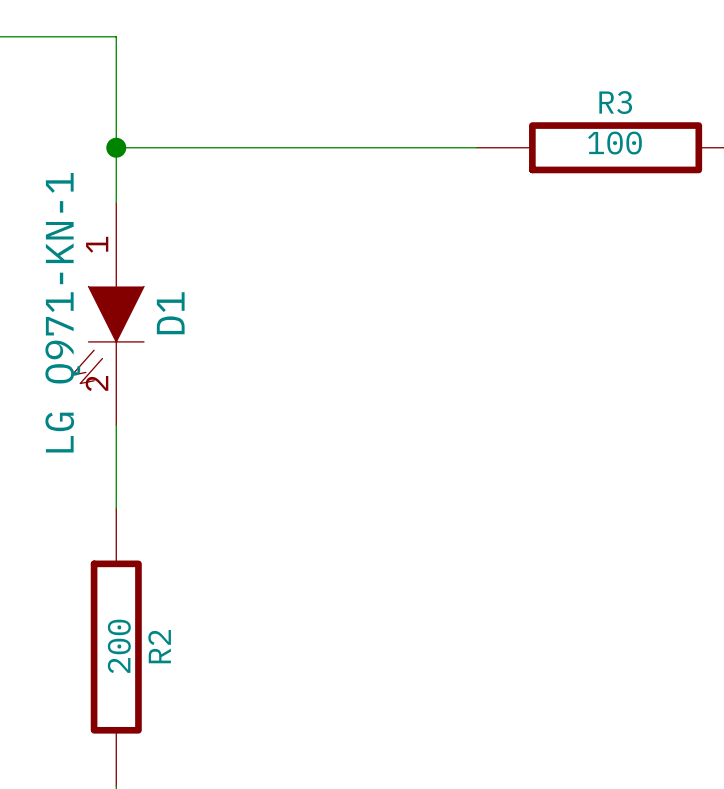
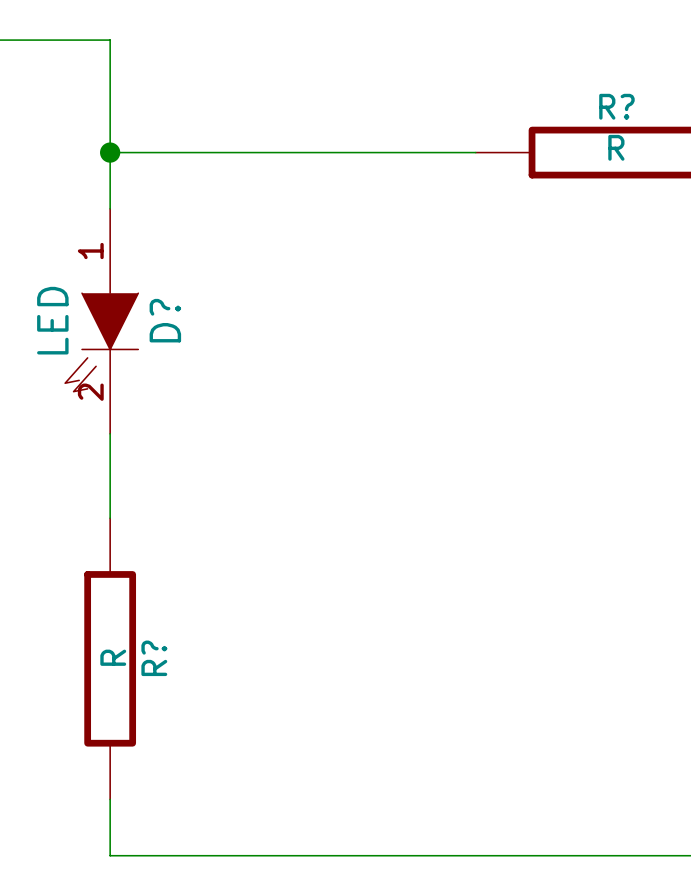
R3 name: R3 (615, 102) -> R? (616, 106)
R3 value: 100 (614, 143) -> R (616, 147)
D1 value: LG Q971-KN-1 (62, 312) -> LED (52, 320)
D1 name: D1 (170, 313) -> D? (165, 320)
R2 value: 200 (119, 646) -> R (113, 657)
R2 name: R2 (159, 646) -> R? (154, 658)

